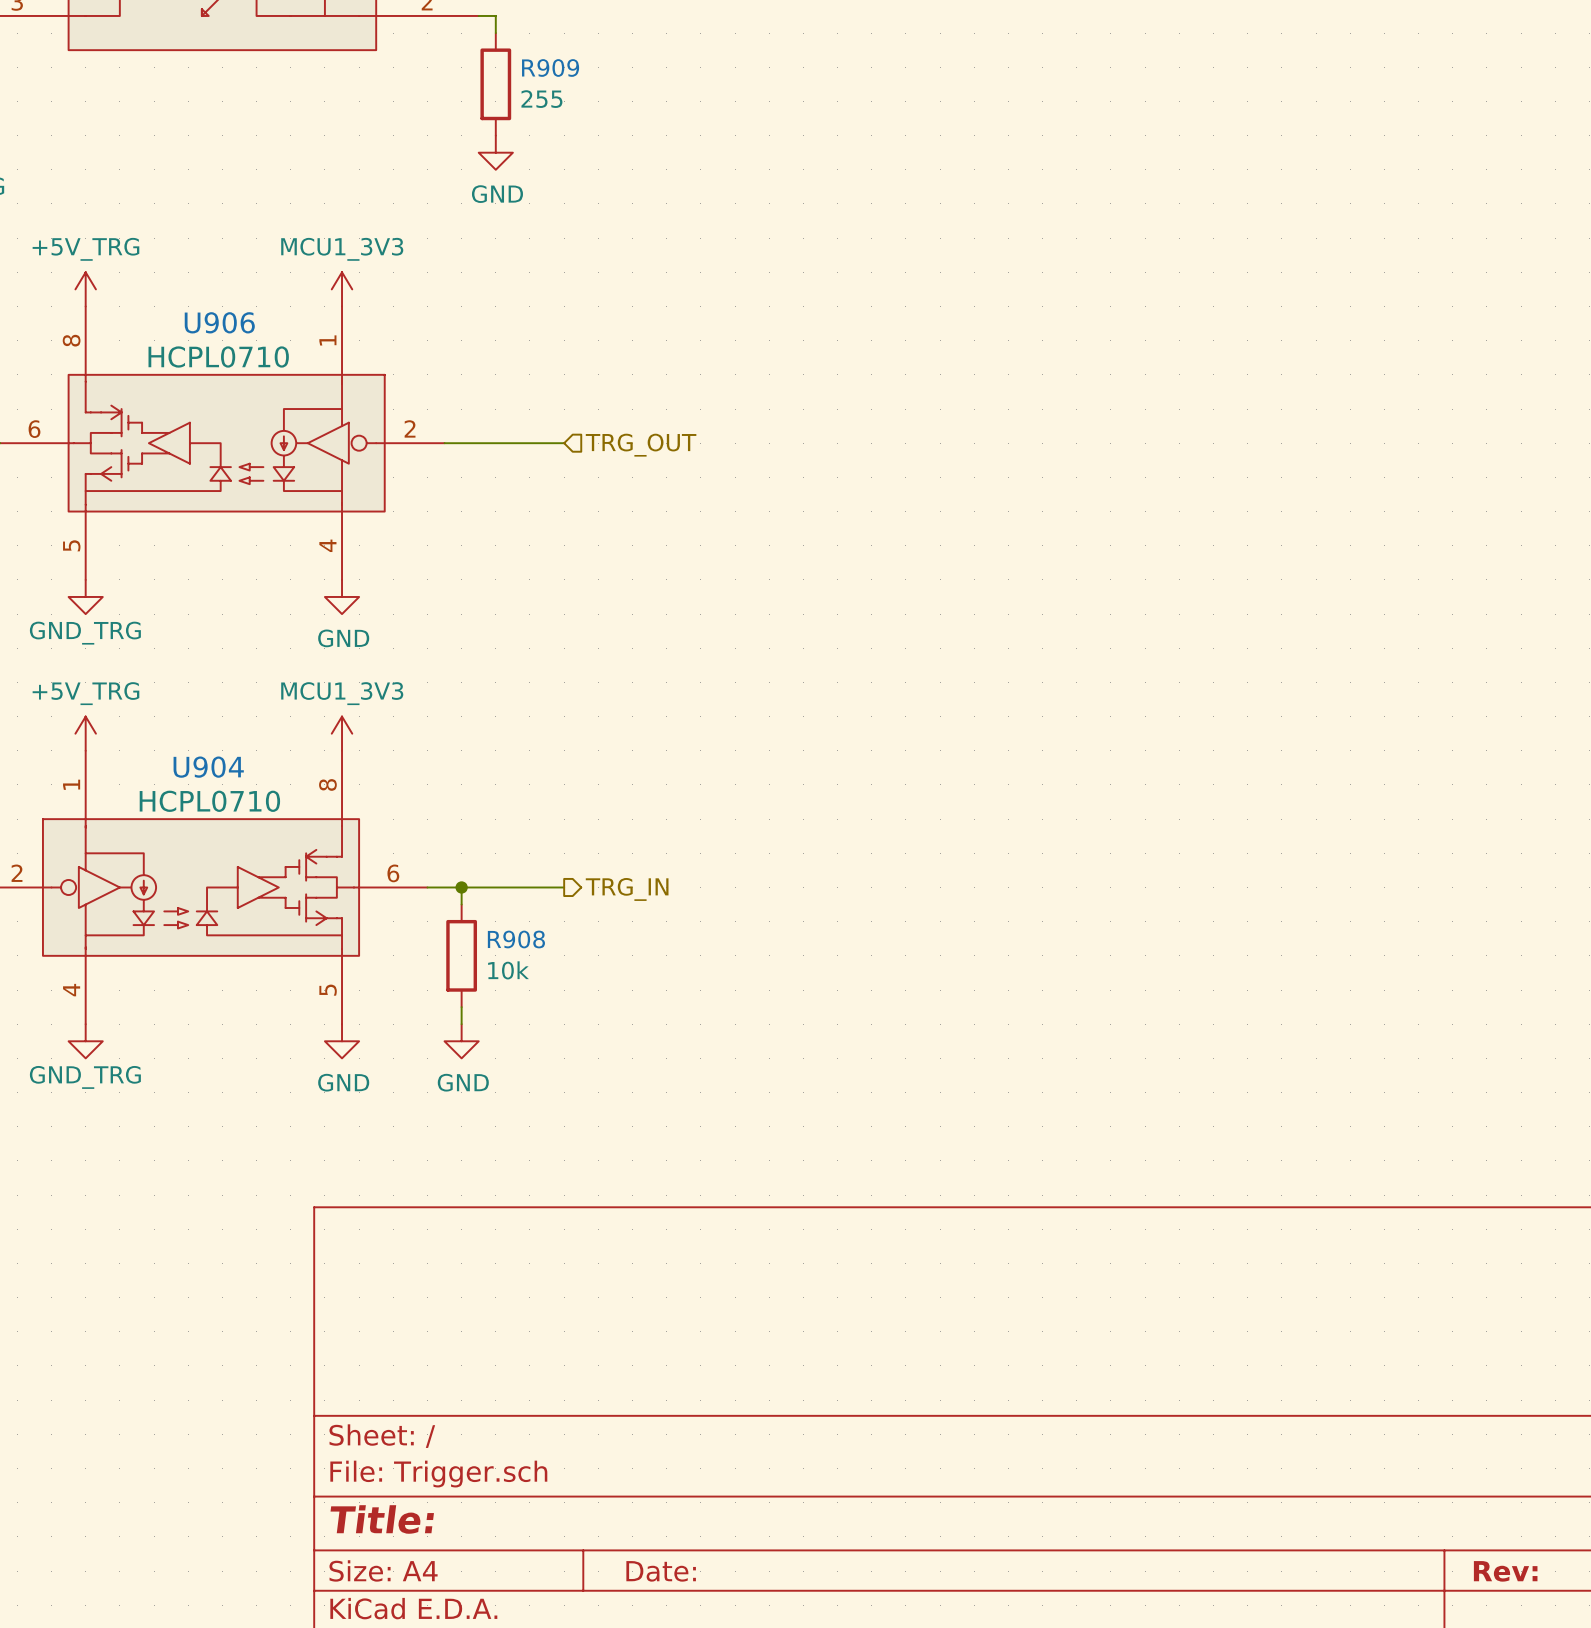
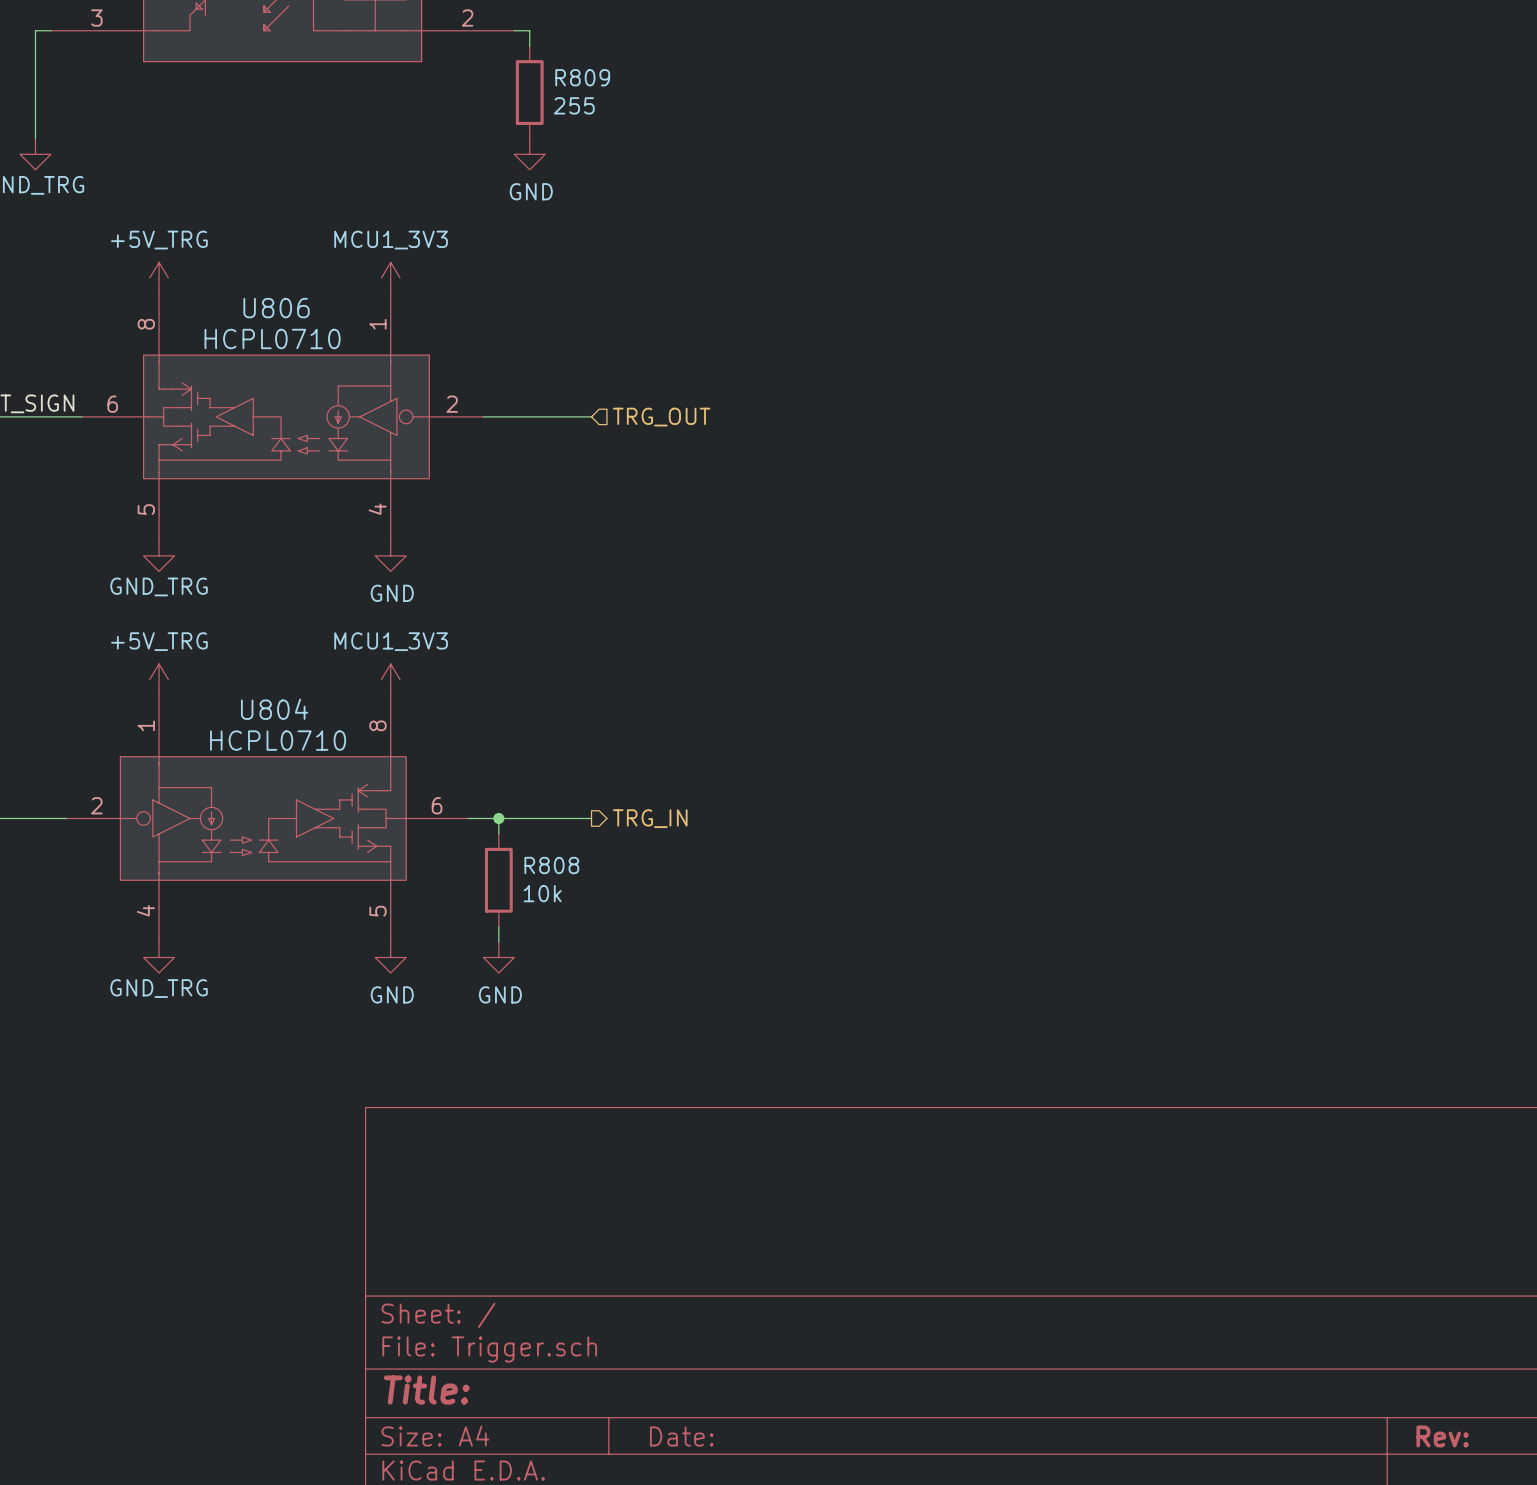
R909 name: R909 (550, 67) -> R809 (582, 77)
U906 name: U906 (219, 322) -> U806 (276, 308)
U904 name: U904 (208, 767) -> U804 (274, 709)
R908 name: R908 (516, 939) -> R808 (551, 865)

